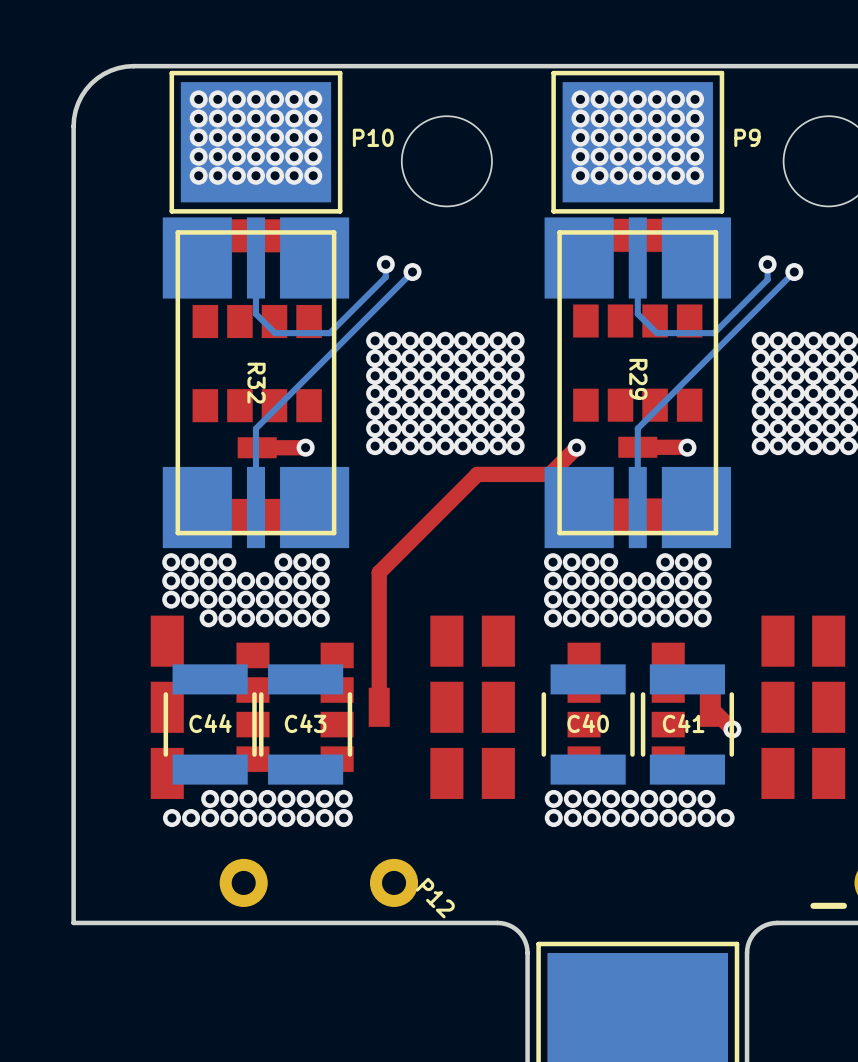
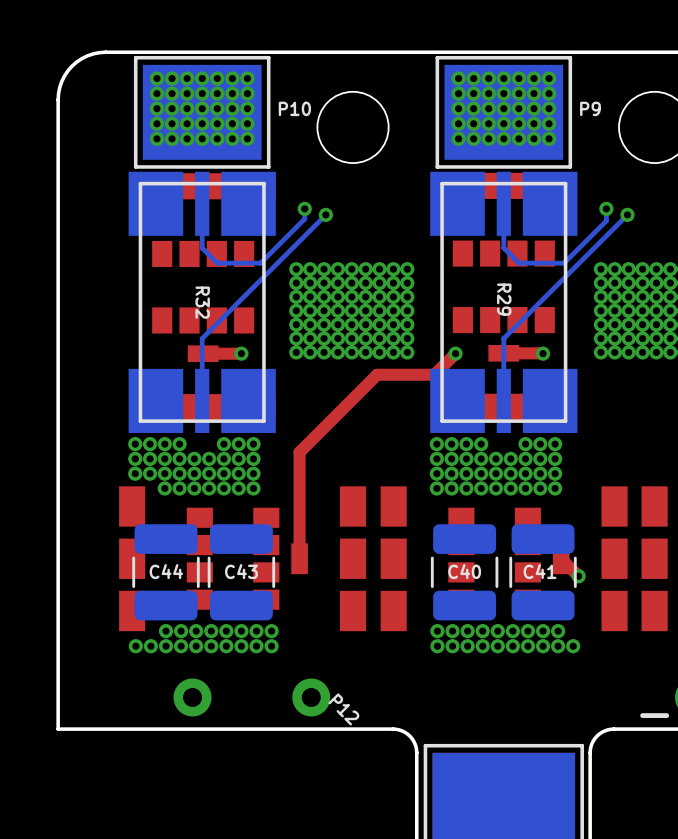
C44 footprint: [163, 664, 257, 785] -> [132, 524, 200, 621]
C43 footprint: [259, 664, 353, 785] -> [207, 524, 276, 621]
C40 footprint: [541, 664, 635, 785] -> [430, 524, 499, 621]
C41 footprint: [640, 664, 735, 785] -> [509, 524, 577, 621]

